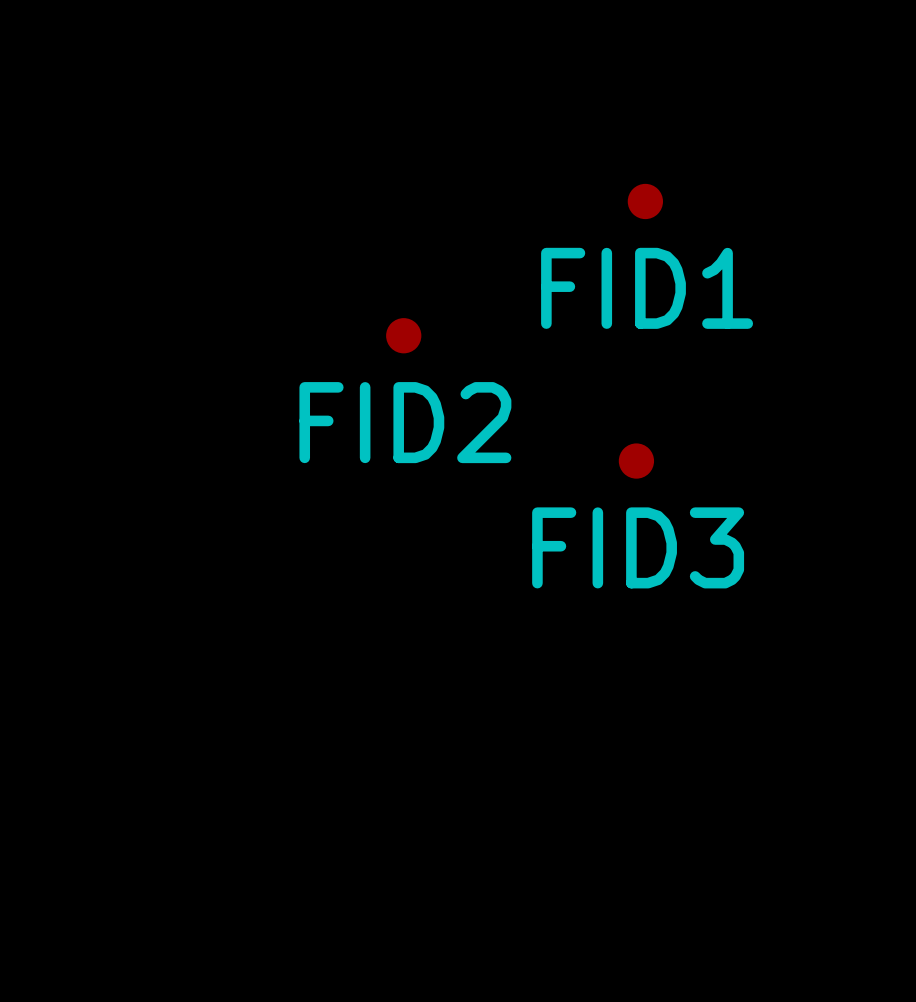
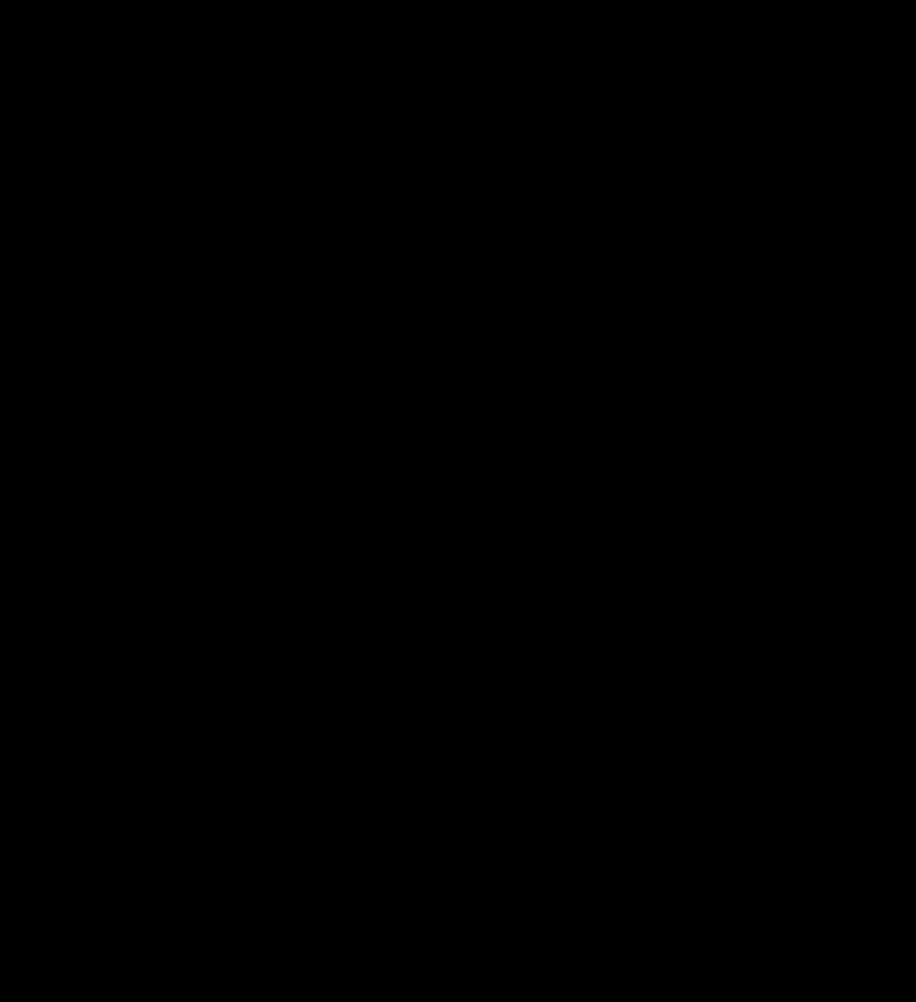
FID1: (645, 201) -> none
FID2: (403, 335) -> none
FID3: (636, 461) -> none

